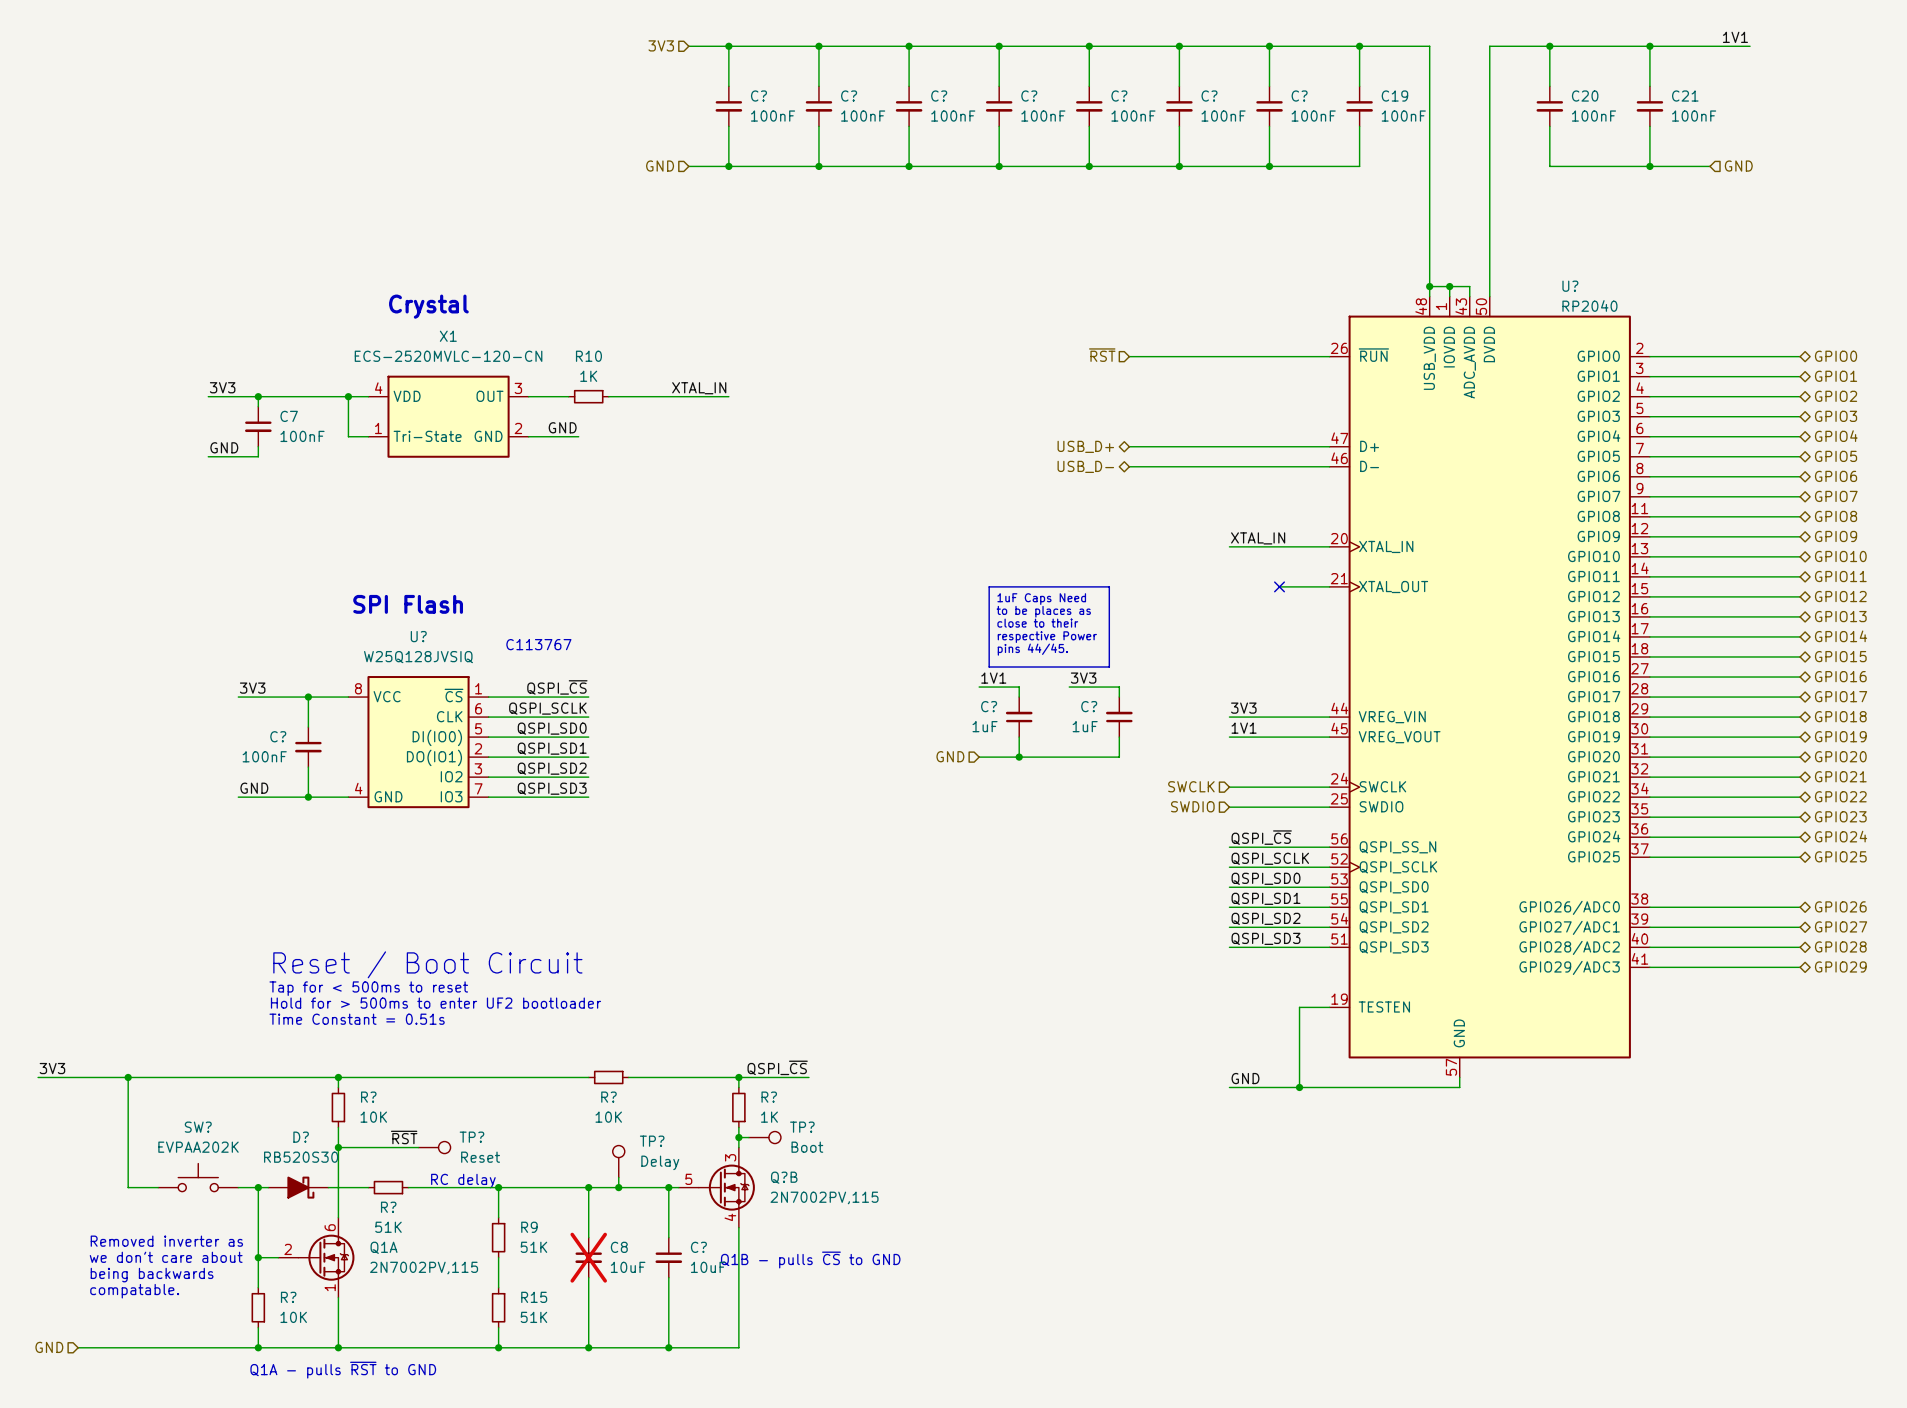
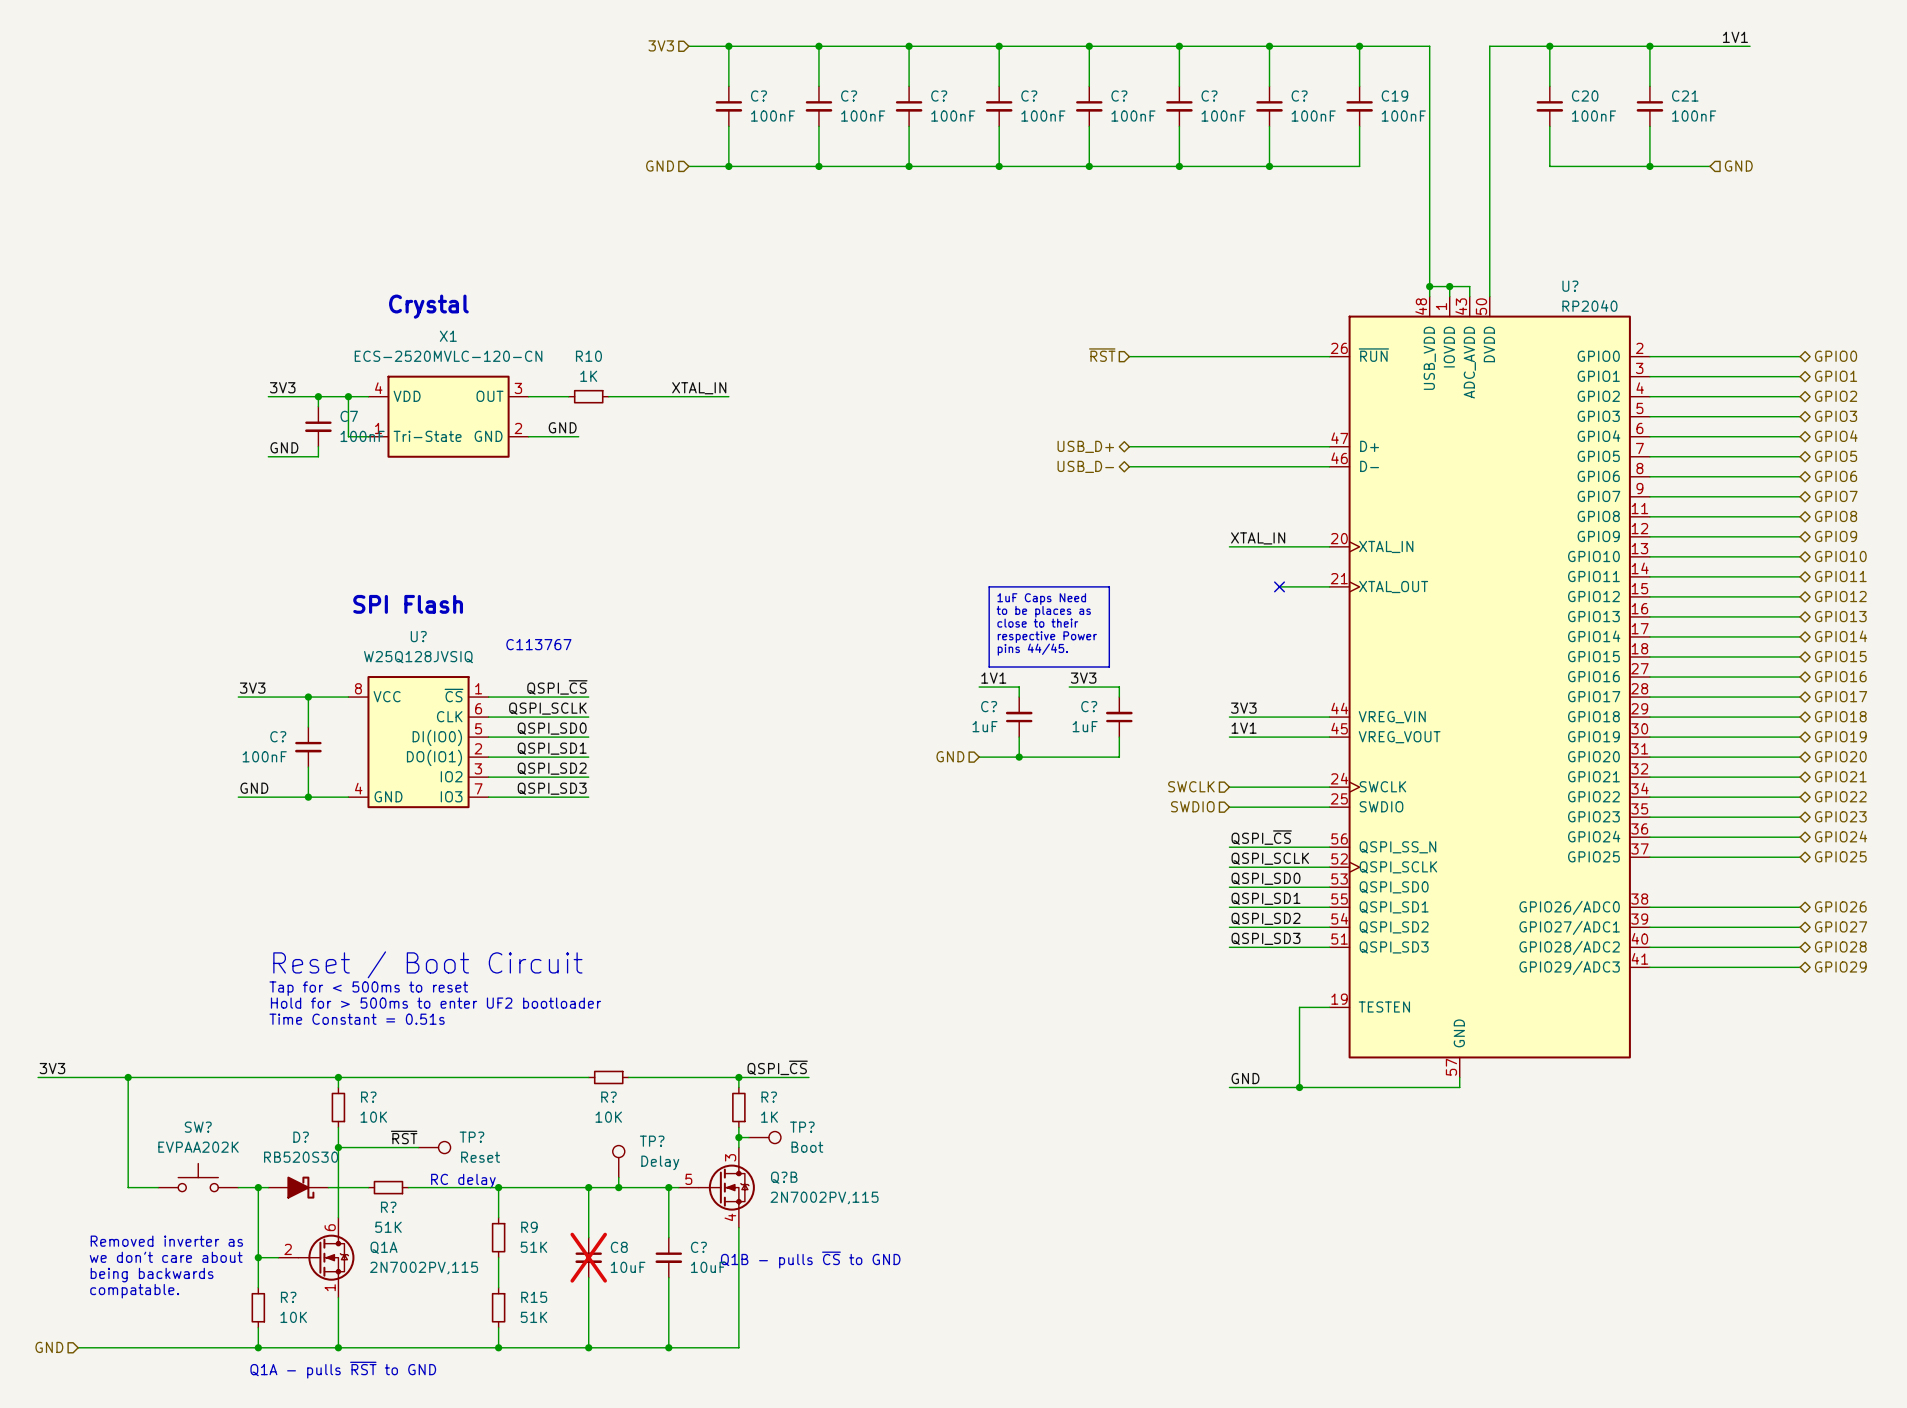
label position: 3V3 (222, 387) -> 3V3 (282, 387)
wire: (208, 396) (268, 396) -> none
wire: (258, 396) (258, 406) -> (318, 396) (318, 406)
junction: (258, 396) -> none
junction: none -> (318, 396)
C7 position: (258, 426) -> (318, 426)
wire: (258, 446) (258, 456) (208, 456) -> (318, 446) (318, 456) (268, 456)
label position: GND (224, 447) -> GND (284, 447)

